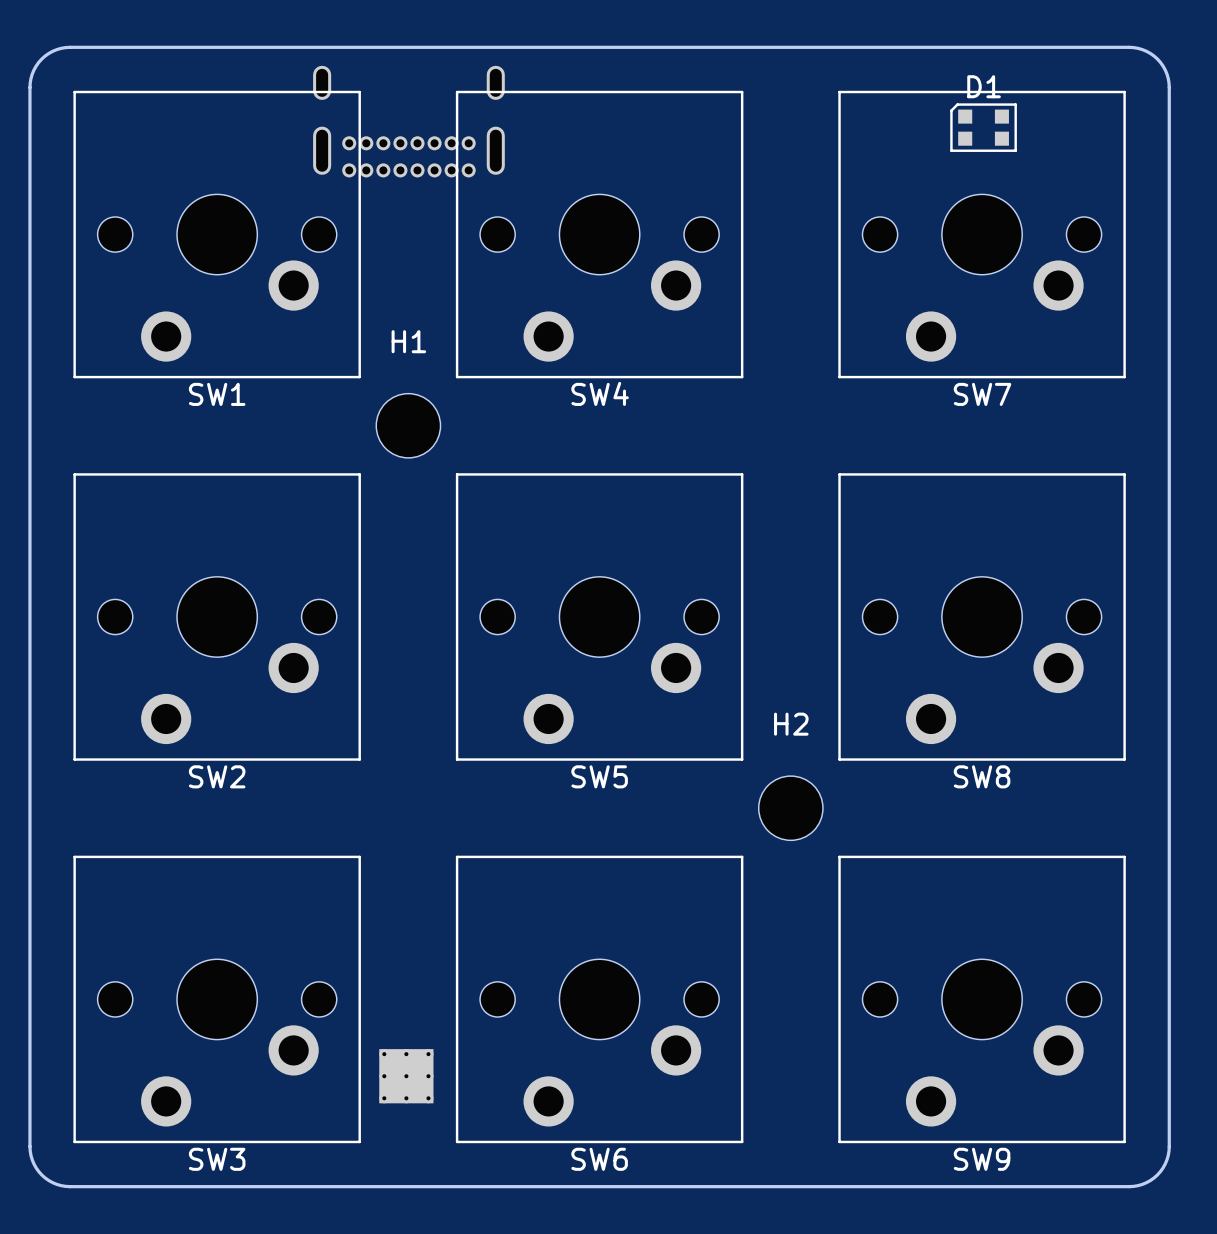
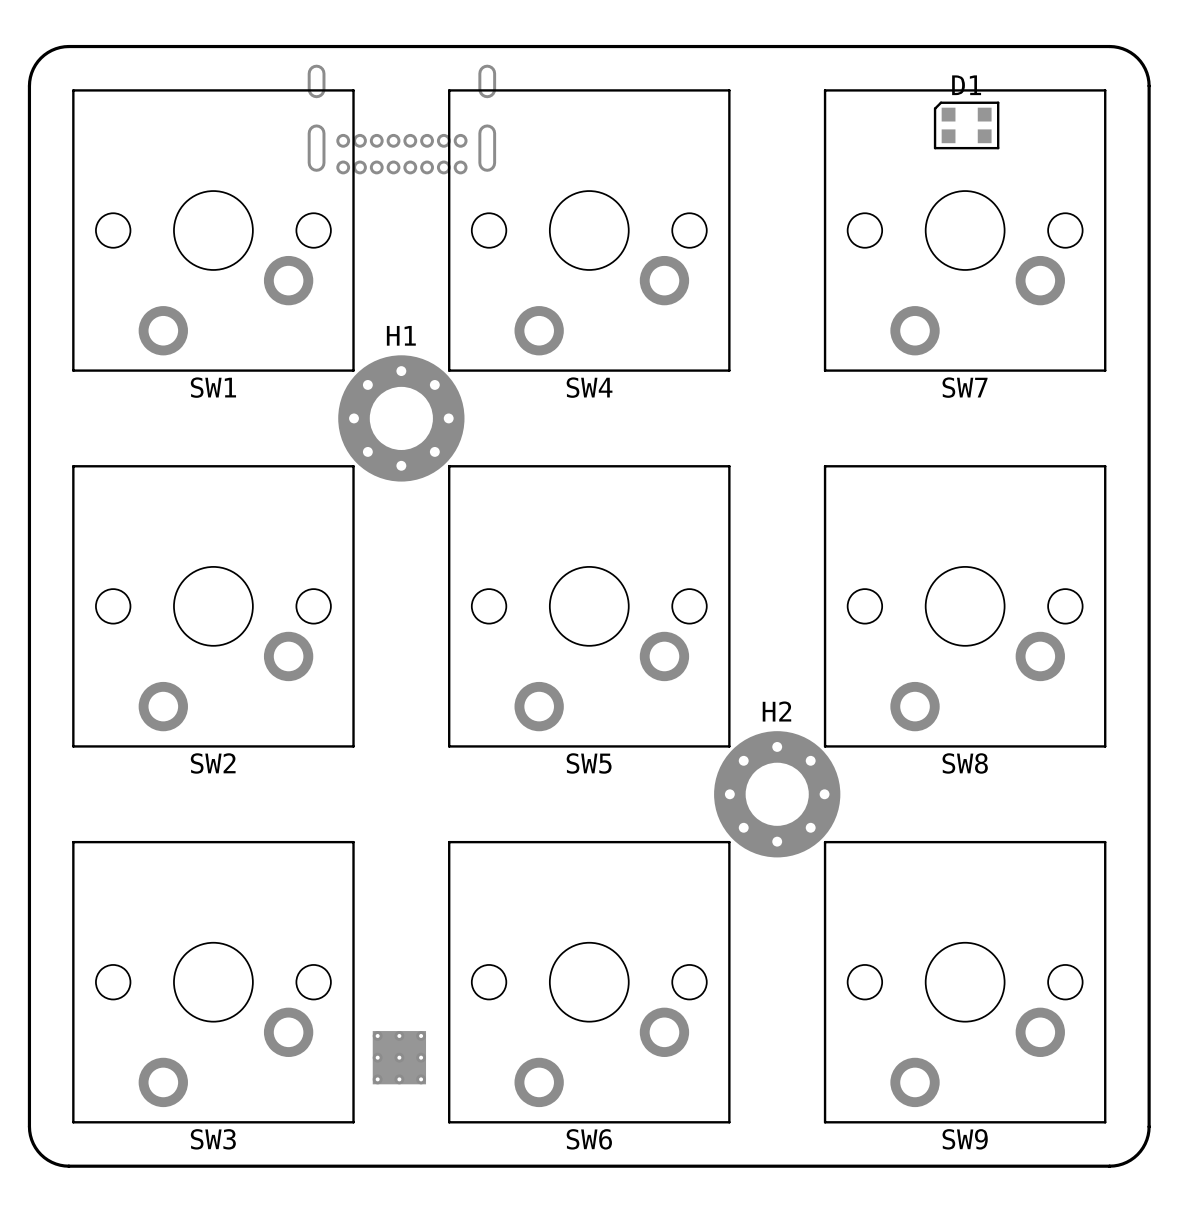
H1 footprint: [376, 393, 441, 458] -> [338, 355, 465, 482]
H2 footprint: [758, 776, 823, 841] -> [714, 731, 841, 858]

